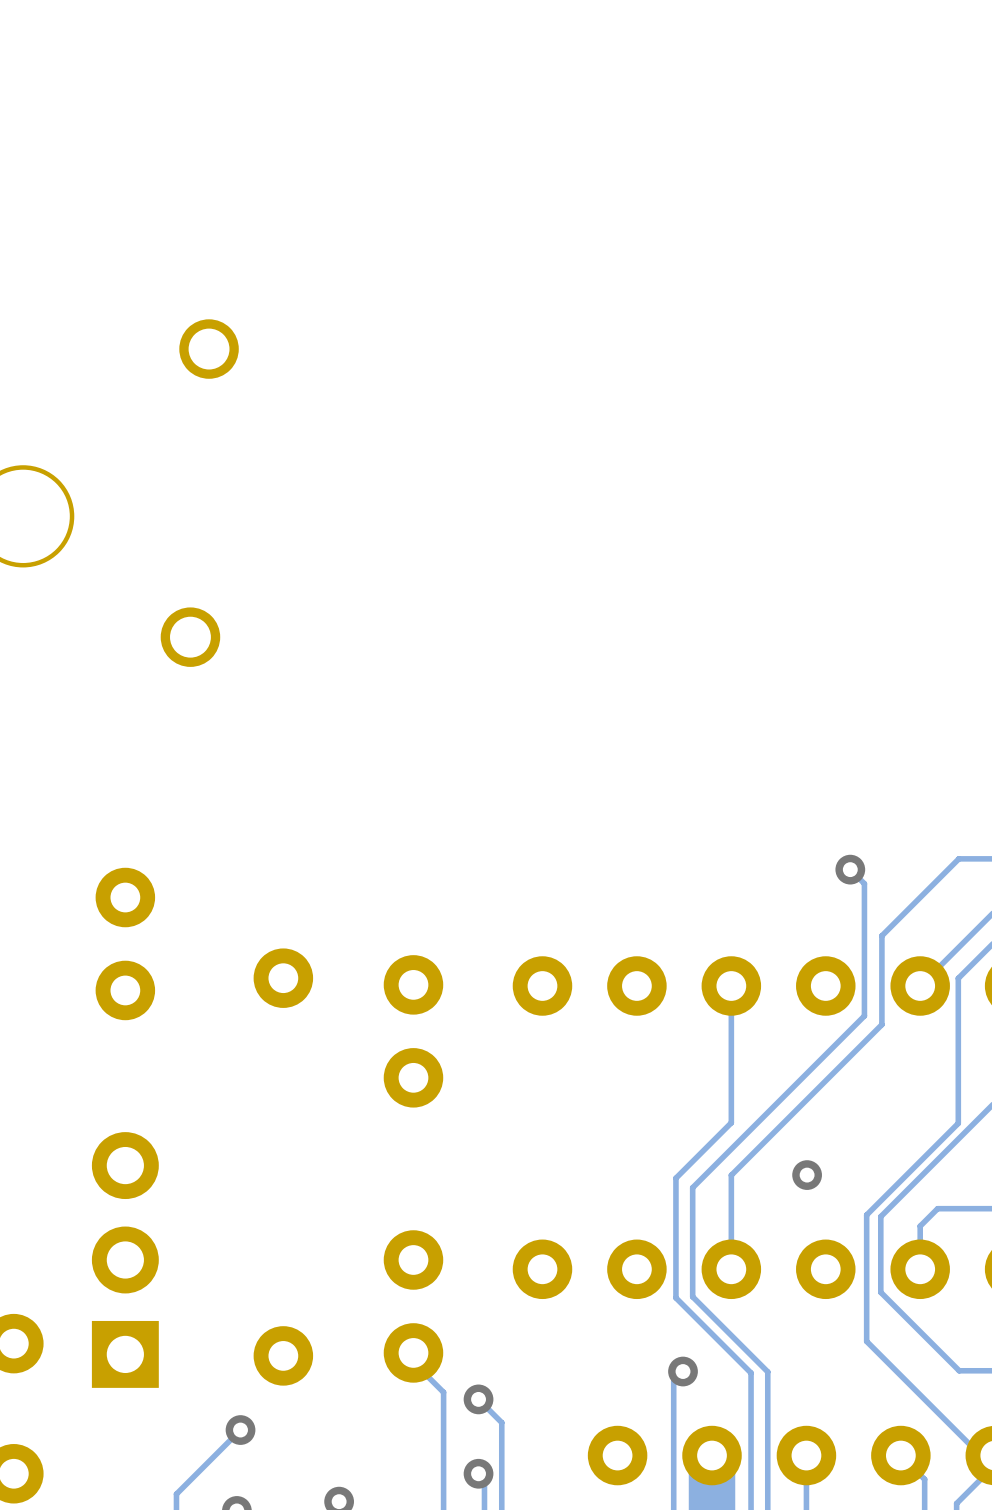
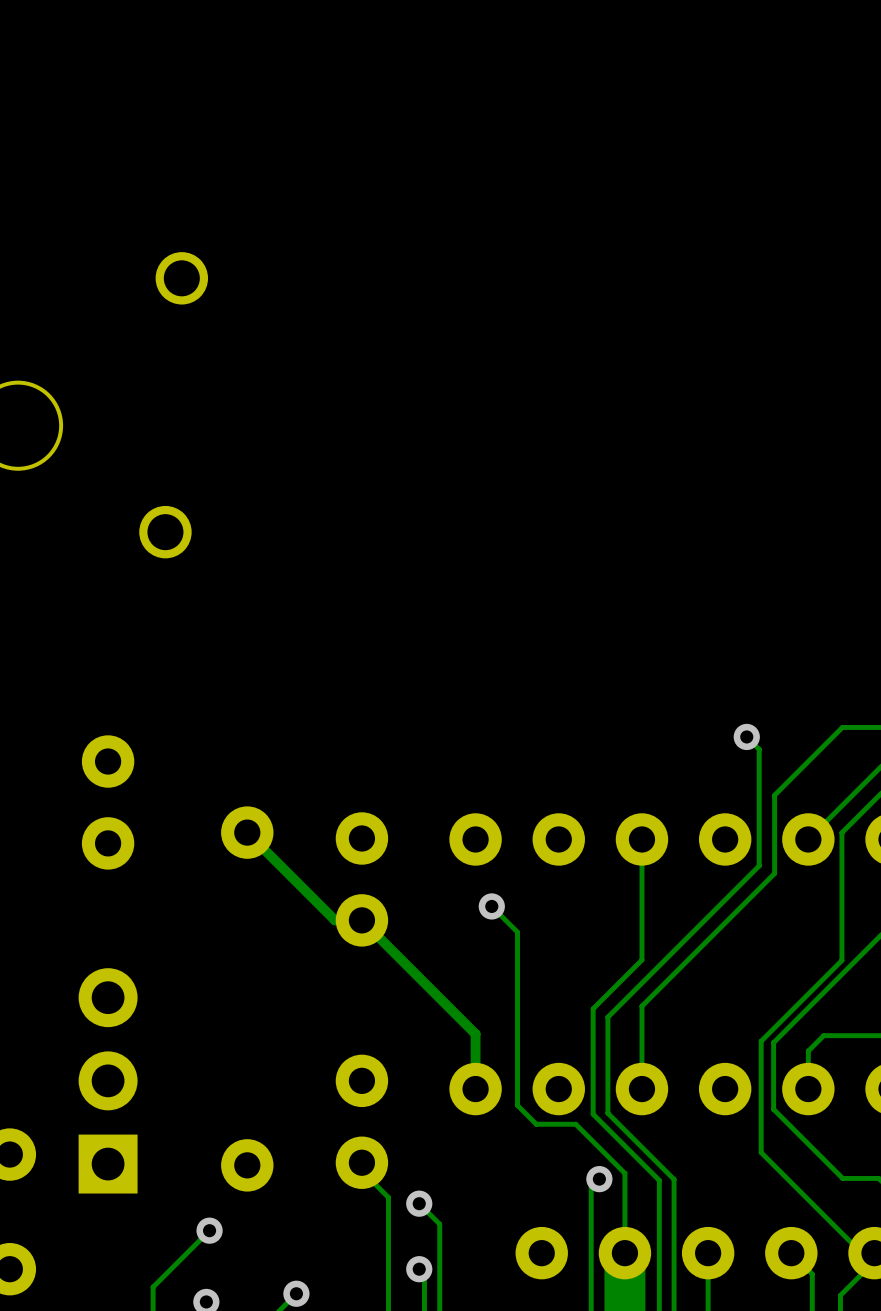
track: none -> (247, 832) (335, 920) (361, 920) (475, 1034) (475, 1089)
track: none -> (491, 906) (517, 932) (517, 1105) (536, 1124) (575, 1124) (624, 1173) (624, 1253)
via: none -> (491, 906)
via: (807, 1175) -> none

